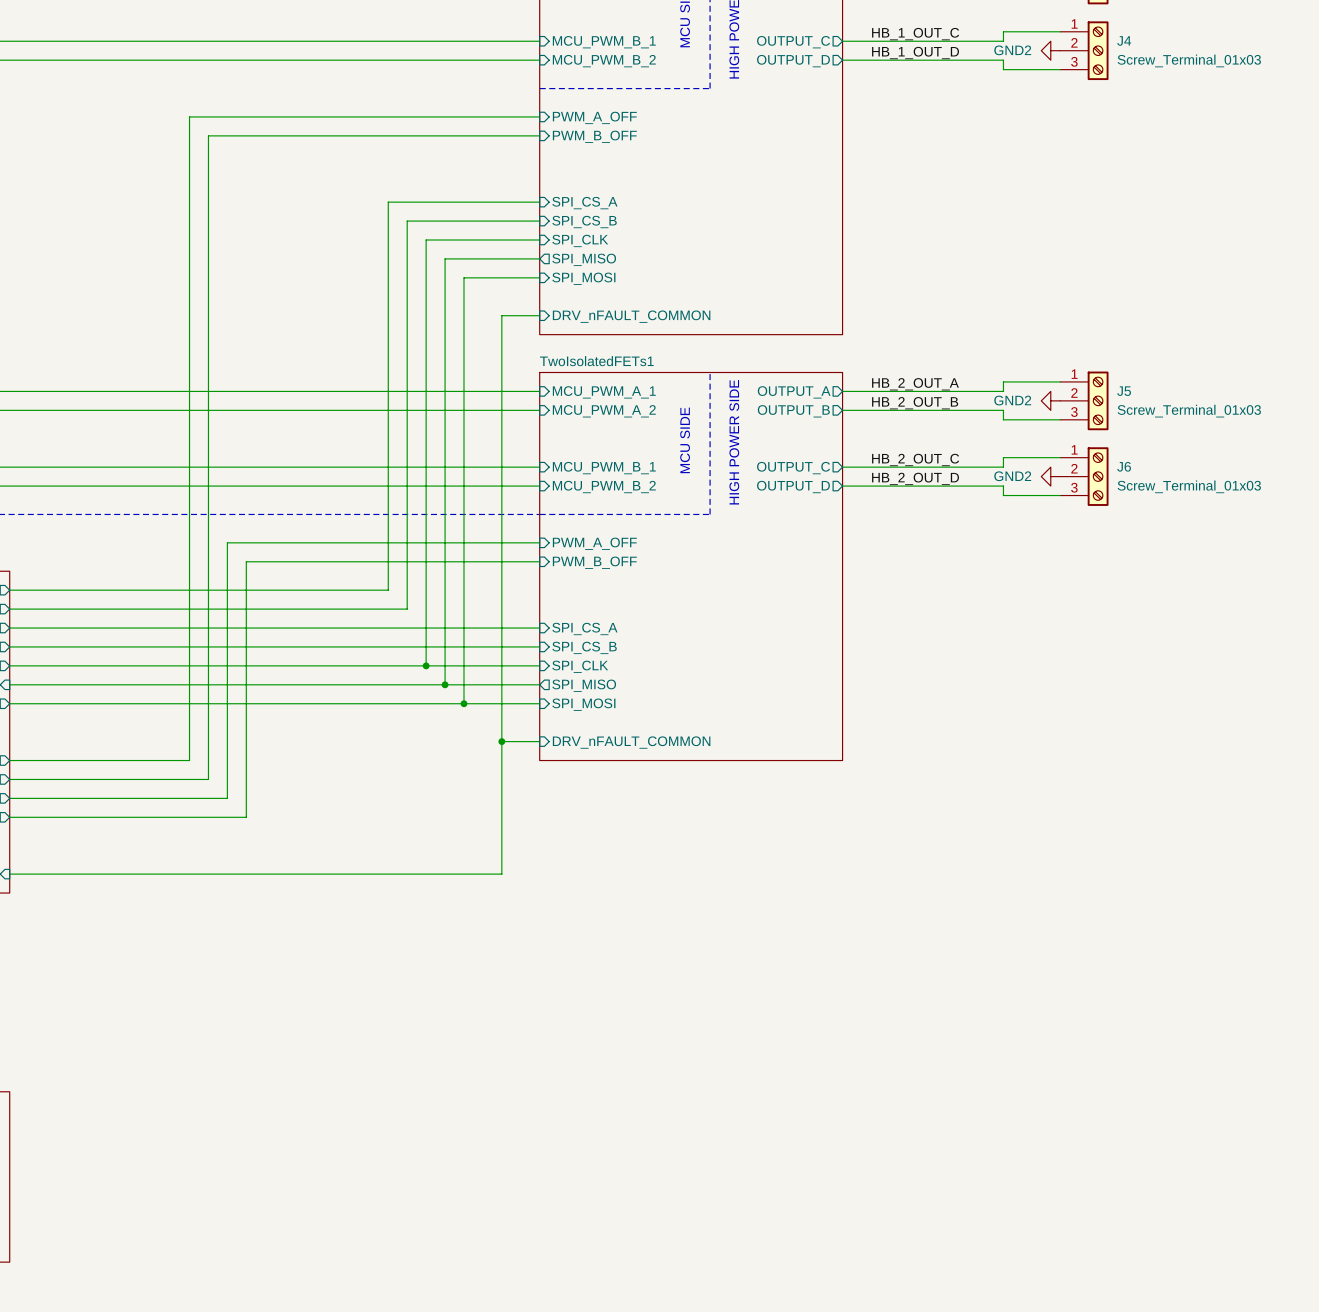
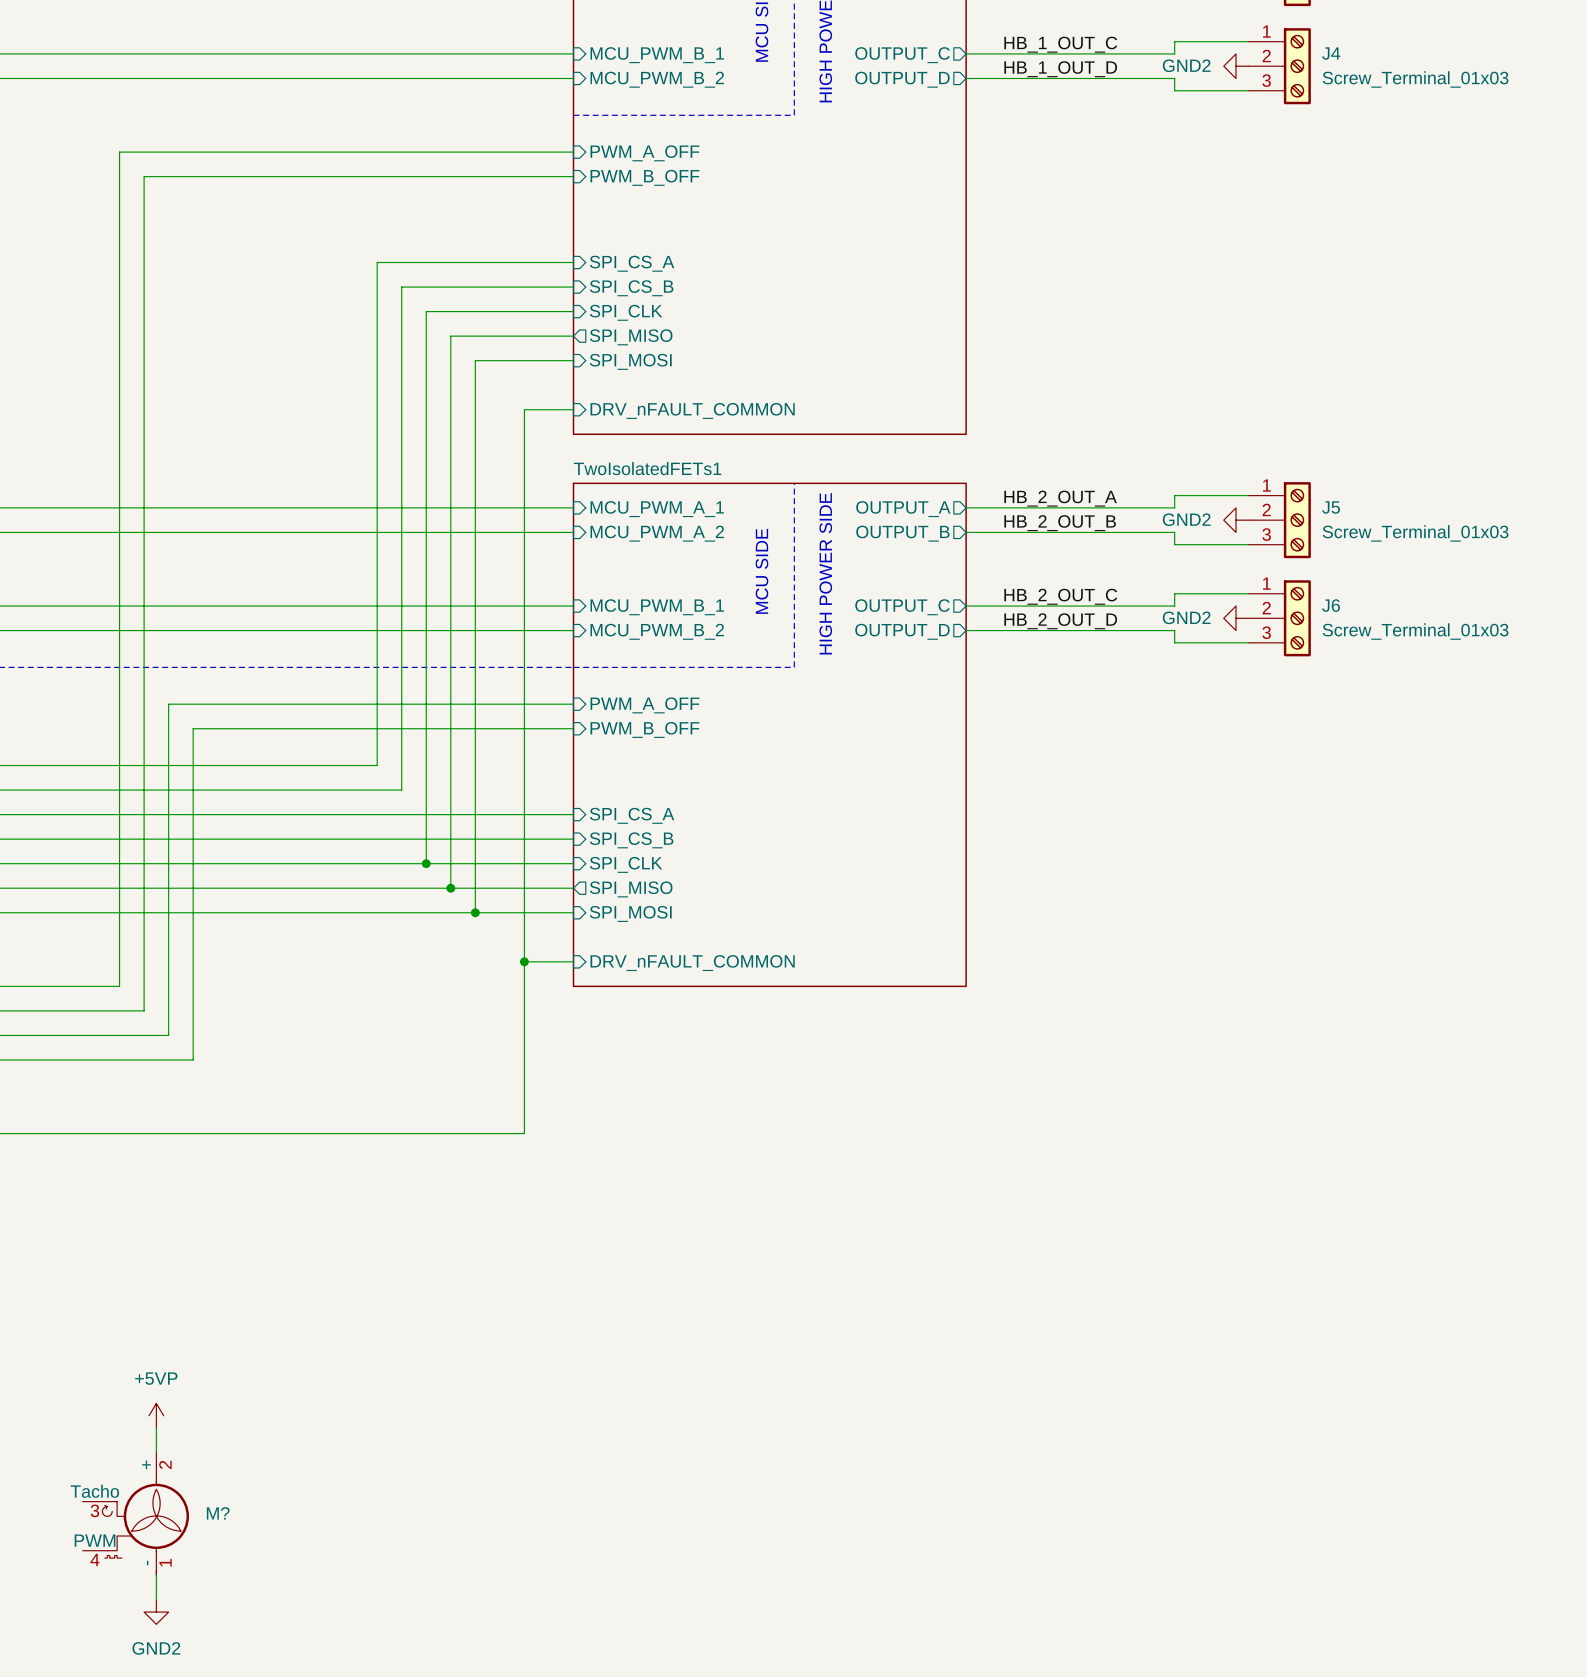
power symbol: none -> +5VP (156, 1415)
wire: none -> (156, 1428) (156, 1452)
M?: none -> (135, 1513)
wire: none -> (156, 1575) (156, 1599)
power symbol: none -> GND2 (156, 1612)

